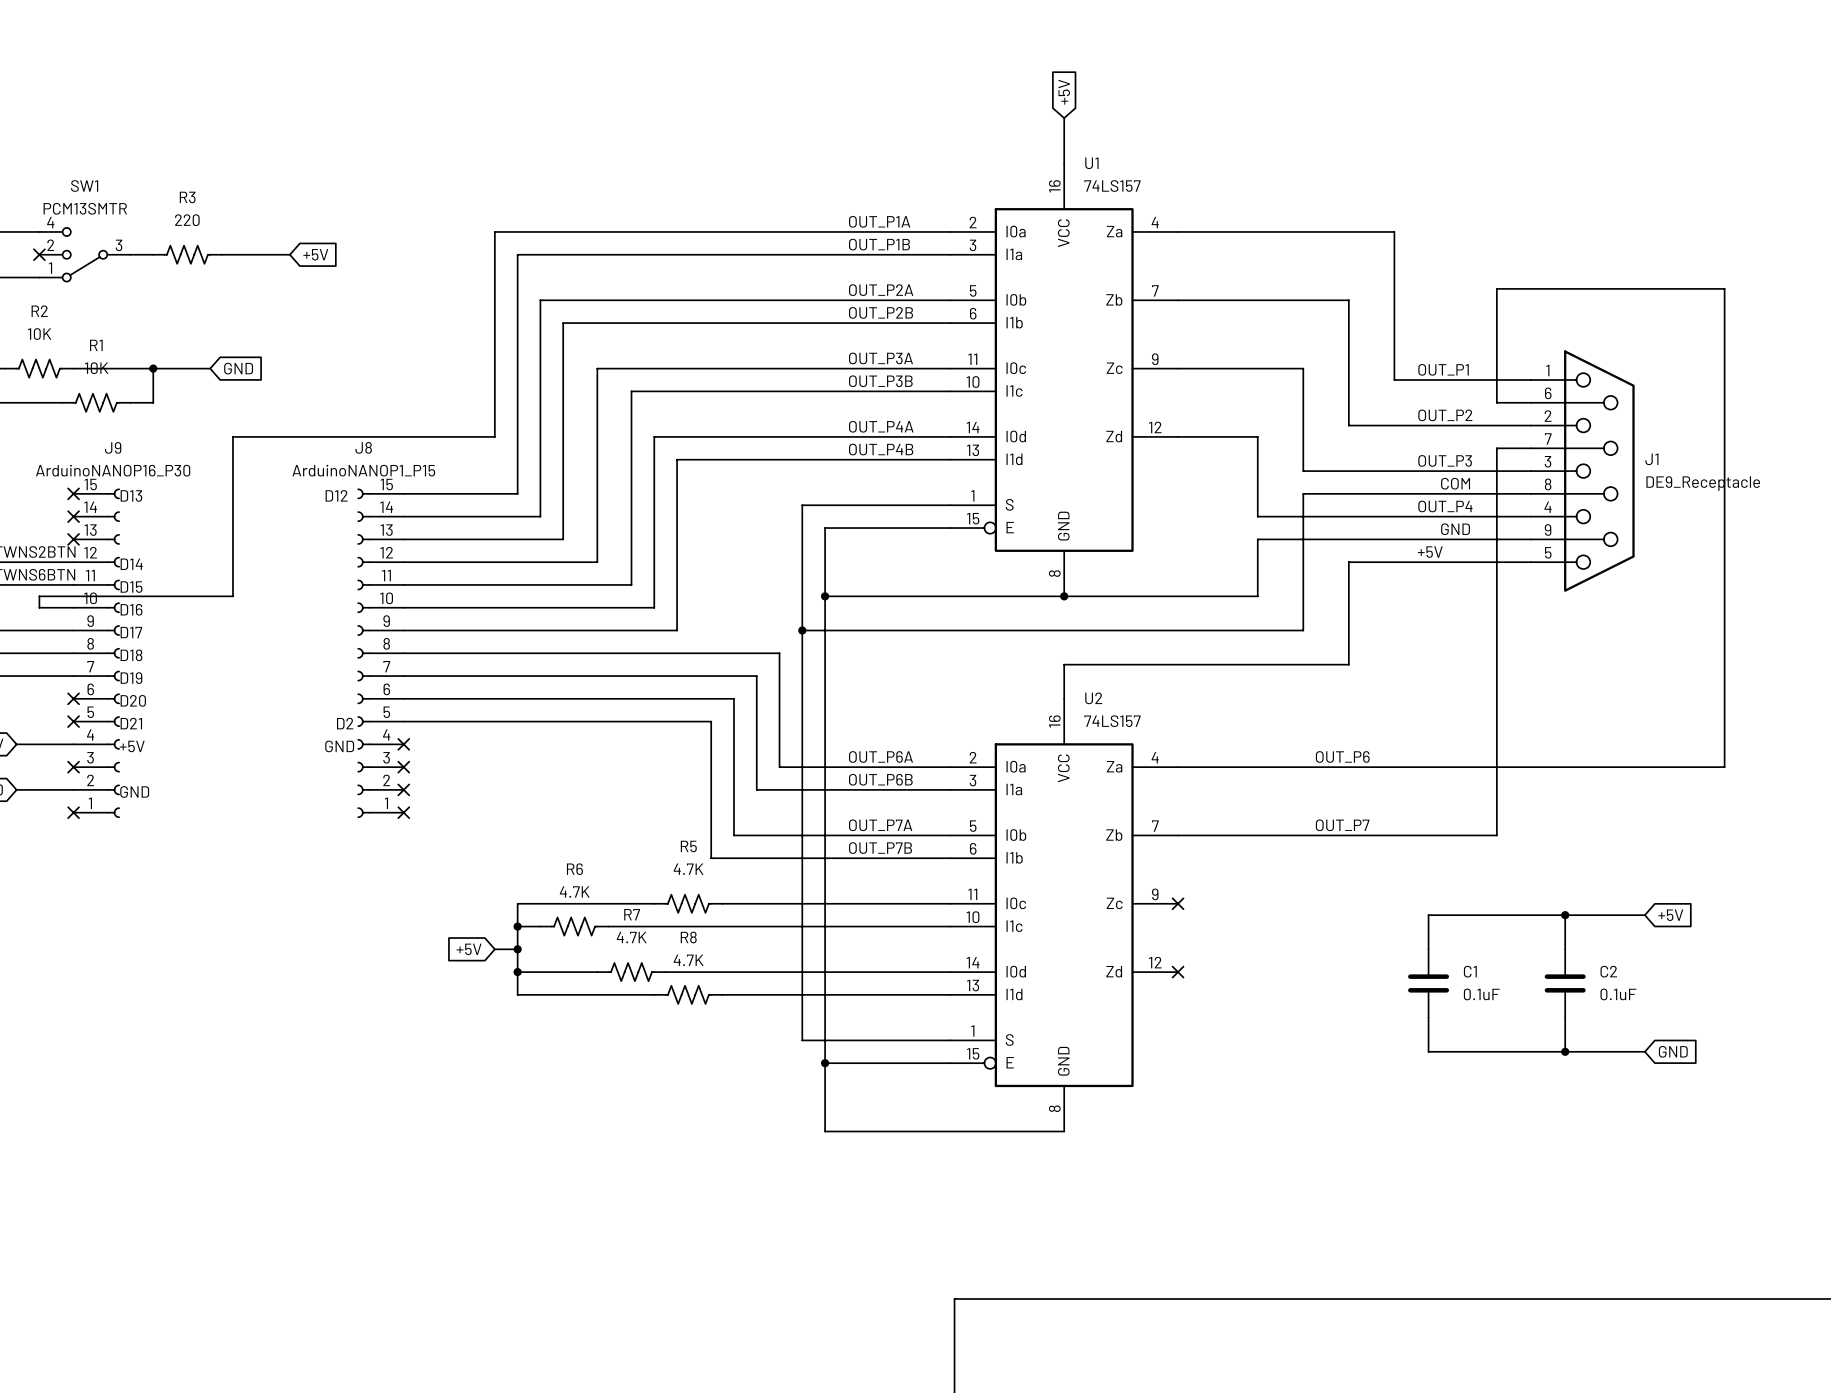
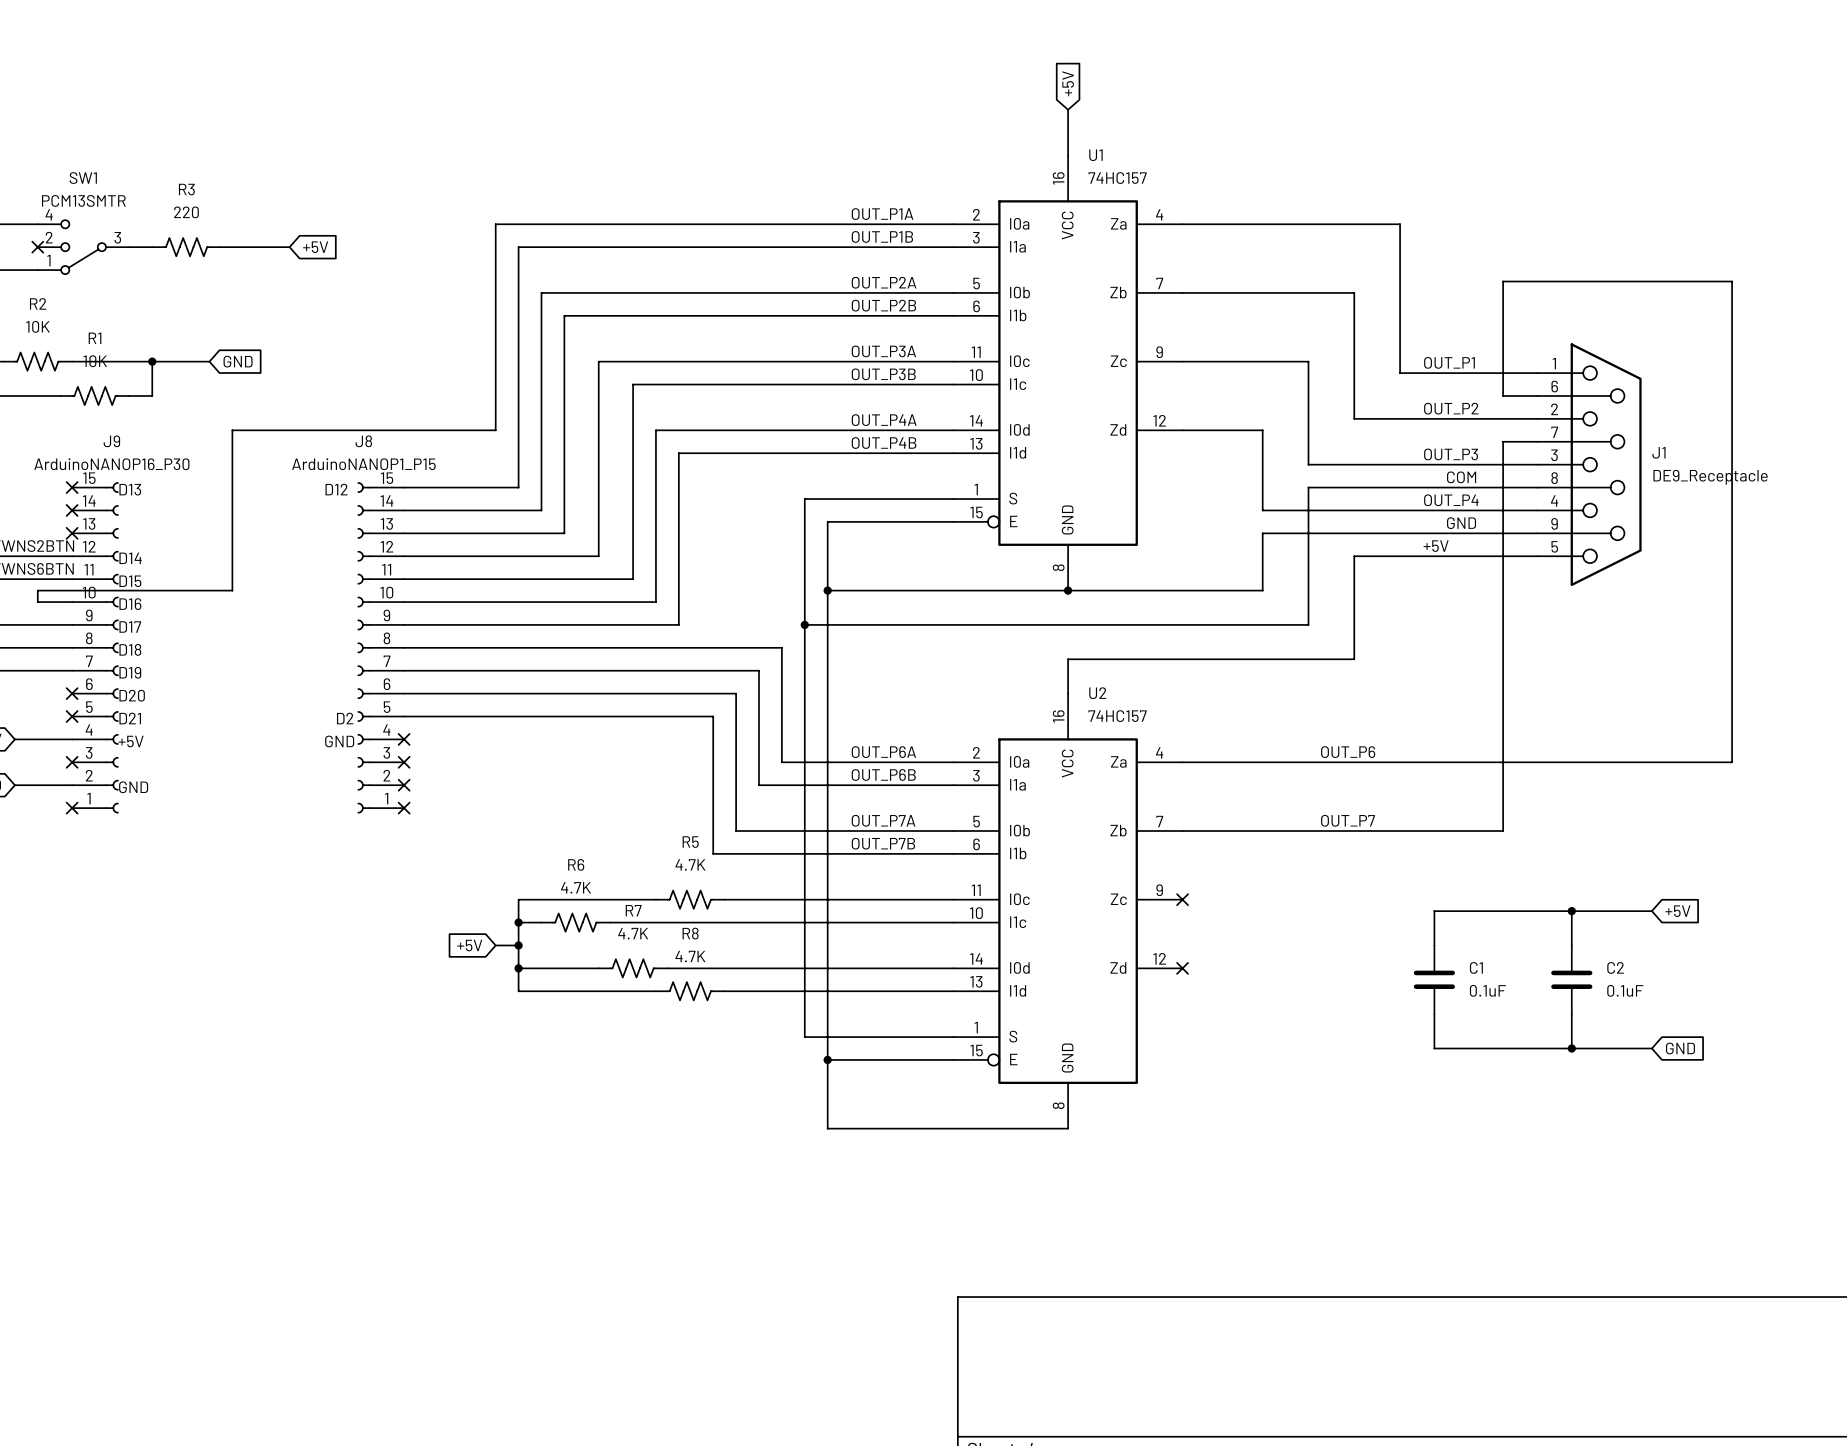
U1 value: 74LS157 (1112, 186) -> 74HC157 (1117, 178)
U2 value: 74LS157 (1112, 721) -> 74HC157 (1117, 716)

